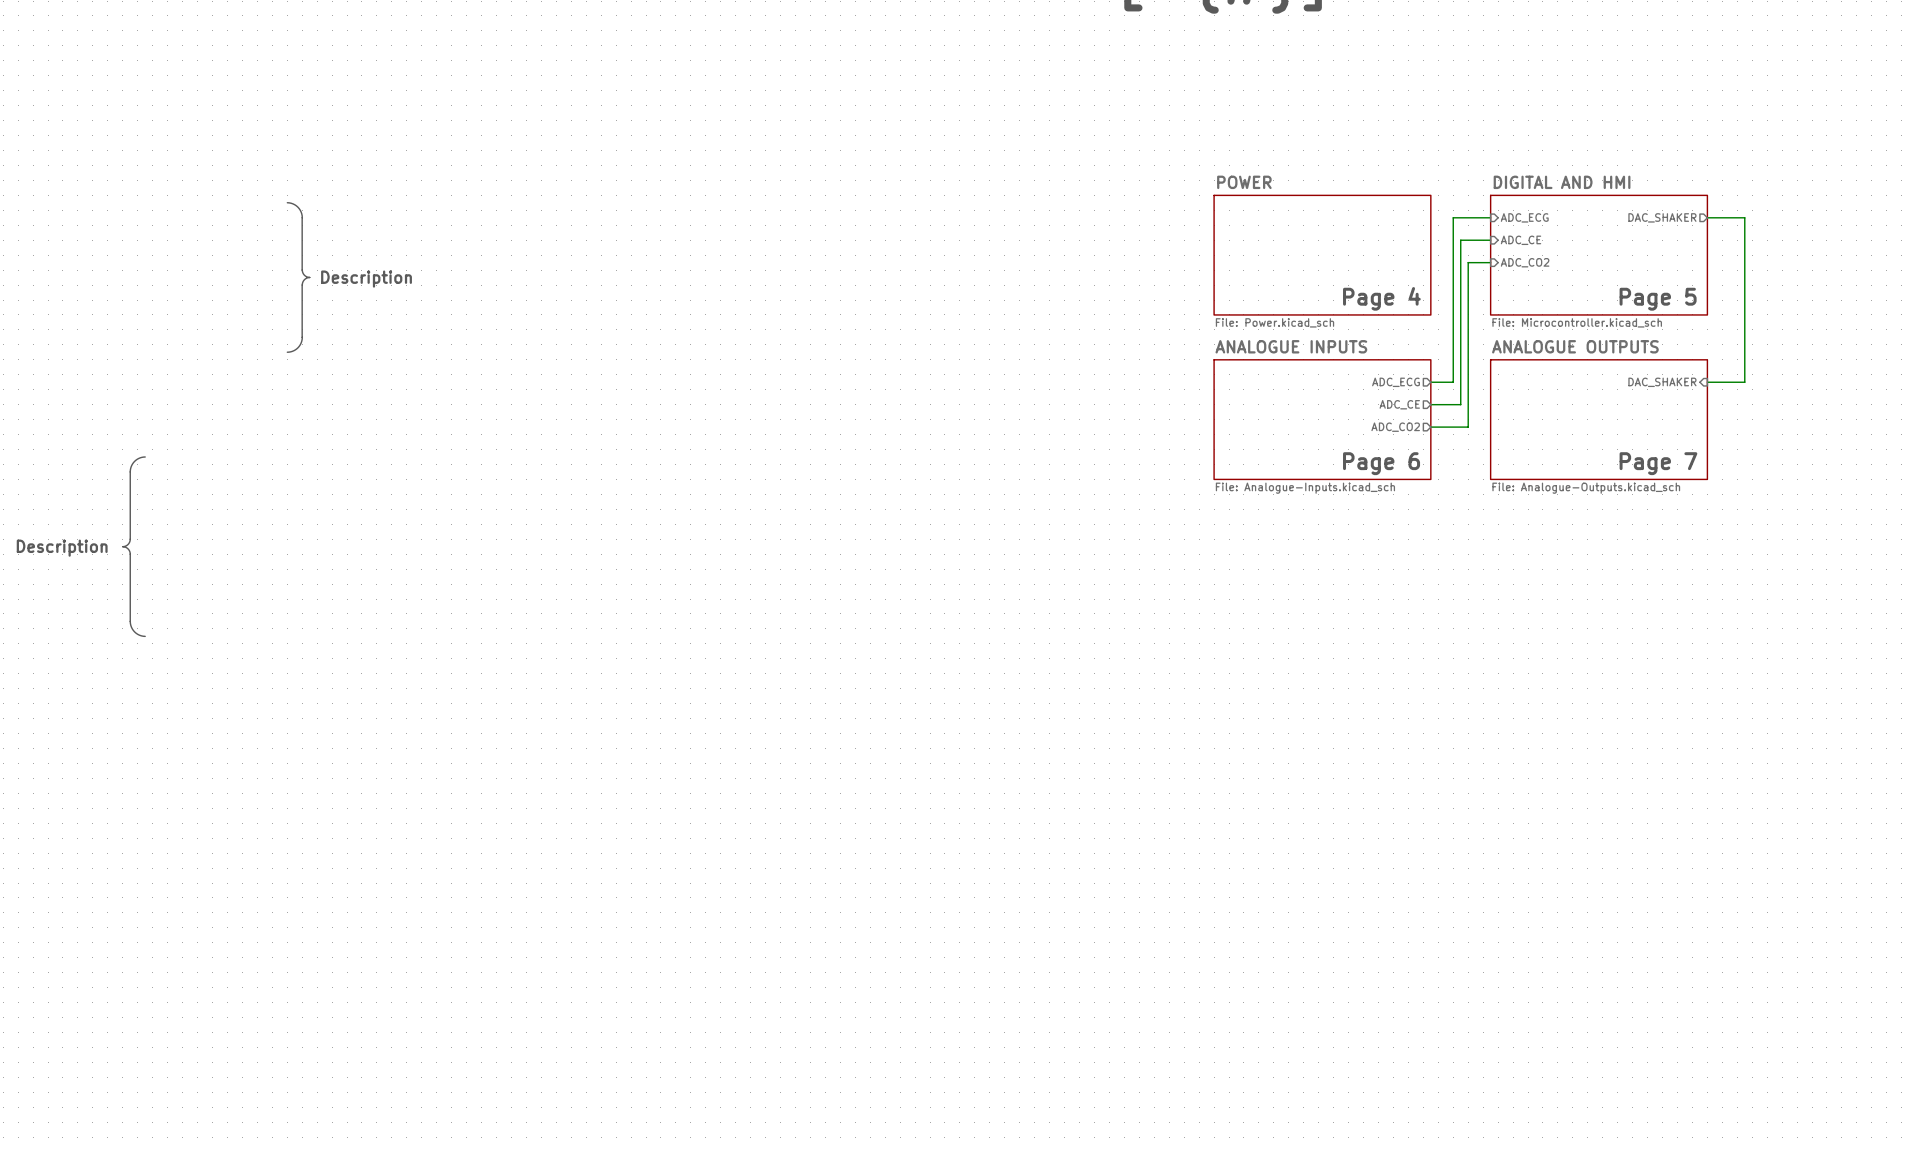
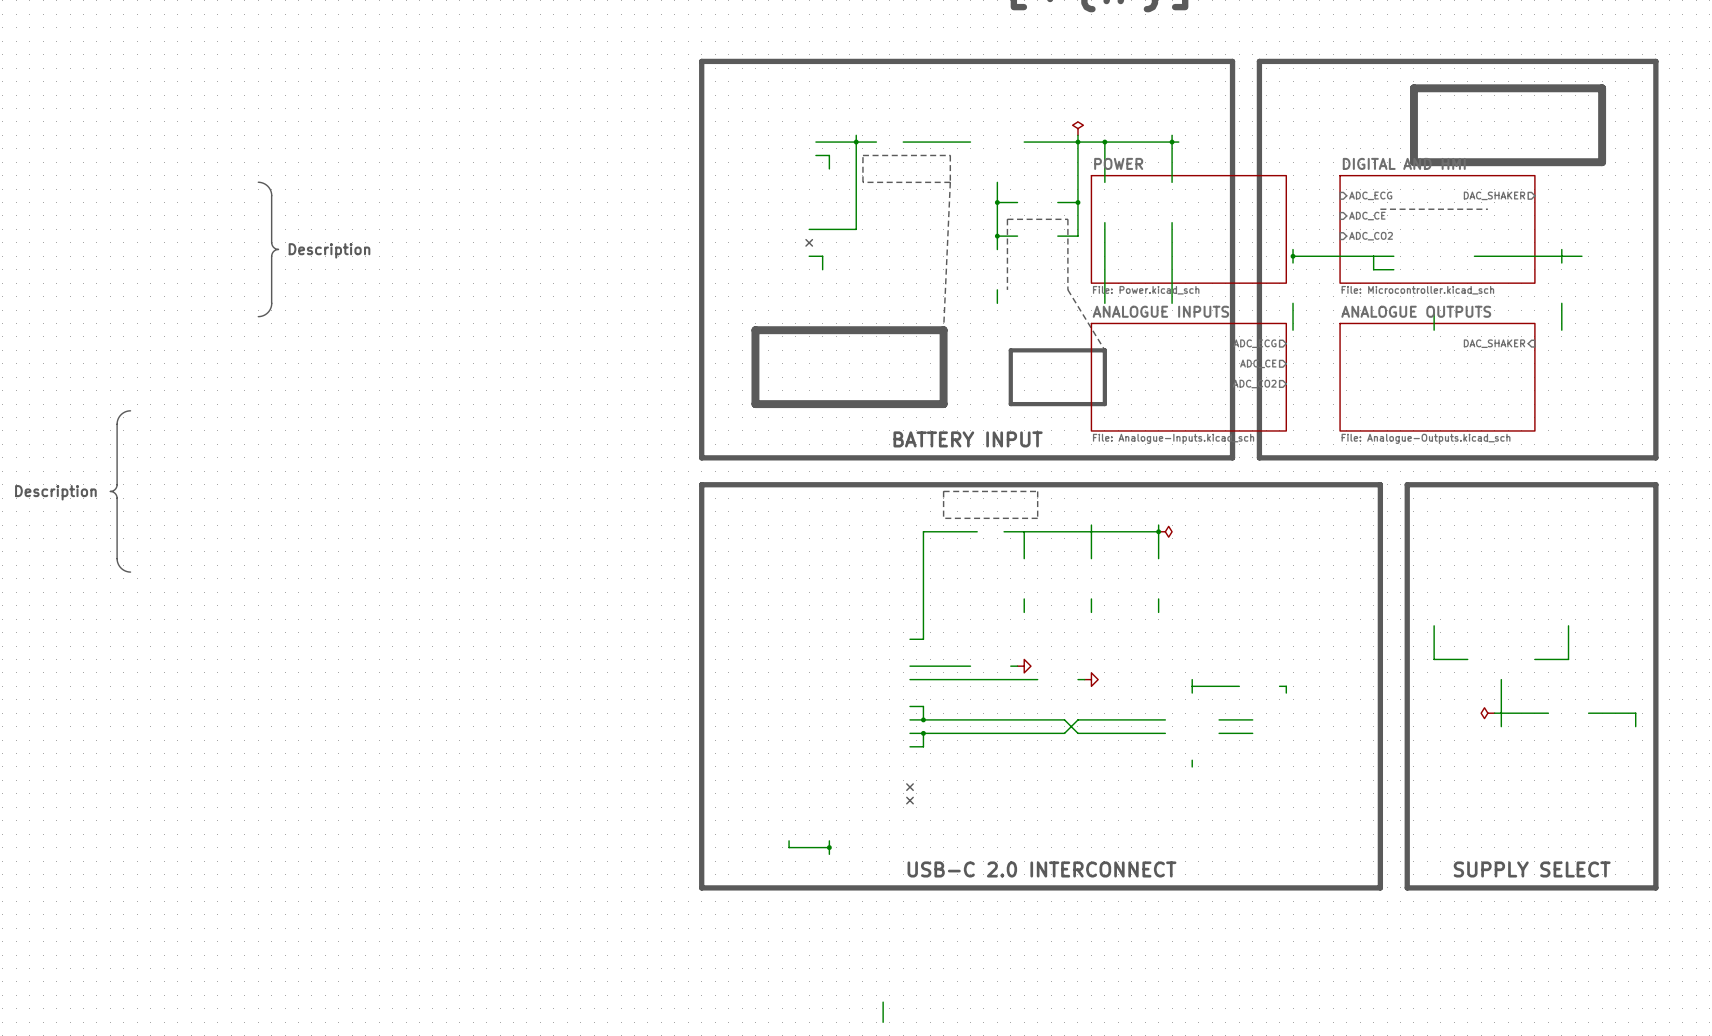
line: none -> (701, 61) (1232, 61) (1232, 457) (701, 457) (701, 61)
line: none -> (1259, 61) (1655, 61) (1655, 457) (1259, 457) (1259, 61)
line: none -> (1413, 88) (1602, 88) (1602, 162) (1413, 162) (1413, 88)
power symbol: none -> (1077, 128)
wire: none -> (856, 135) (856, 229) (809, 229)
wire: none -> (1077, 135) (1077, 236) (1057, 236)
wire: none -> (1172, 135) (1172, 182)
wire: none -> (815, 142) (876, 142)
junction: none -> (856, 142)
wire: none -> (903, 142) (970, 142)
wire: none -> (1024, 142) (1178, 142)
junction: none -> (1077, 142)
wire: none -> (1104, 142) (1104, 182)
junction: none -> (1104, 142)
junction: none -> (1172, 142)
wire: none -> (815, 155) (829, 155) (829, 168)
line: none -> (950, 182) (950, 155) (862, 155) (862, 182) (950, 182)
line: none -> (950, 182) (943, 330)
wire: none -> (997, 182) (997, 249)
wire: (1490, 217) (1453, 217) (1453, 382) (1430, 382) -> none
wire: (1707, 217) (1744, 217) (1744, 382) (1707, 382) -> none
wire: none -> (997, 202) (1017, 202)
junction: none -> (997, 202)
wire: none -> (1057, 202) (1077, 202)
junction: none -> (1077, 202)
line: none -> (1380, 209) (1487, 209)
wire: (1490, 240) (1460, 240) (1460, 404) (1430, 404) -> none
wire: none -> (1104, 222) (1104, 303)
wire: none -> (1172, 222) (1172, 303)
wire: none -> (997, 236) (1017, 236)
junction: none -> (997, 236)
wire: (1490, 262) (1468, 262) (1468, 427) (1430, 427) -> none
no-connect mark: none -> (809, 242)
wire: none -> (1293, 249) (1293, 262)
wire: none -> (1561, 249) (1561, 262)
wire: none -> (809, 256) (822, 256) (822, 269)
wire: none -> (1293, 256) (1393, 256)
junction: none -> (1293, 256)
wire: none -> (1373, 256) (1373, 269) (1393, 269)
wire: none -> (1474, 256) (1581, 256)
text: Page 4 (1381, 298) -> none
text: Page 5 (1658, 299) -> none
wire: none -> (997, 289) (997, 303)
line: none -> (1007, 289) (1007, 219) (1067, 219) (1067, 289) (1104, 350)
wire: none -> (1293, 303) (1293, 330)
wire: none -> (1561, 303) (1561, 330)
wire: none -> (1434, 310) (1434, 330)
line: none -> (943, 330) (755, 330) (755, 404) (943, 404) (943, 330)
line: none -> (1104, 350) (1104, 404) (1010, 404) (1010, 350) (1104, 350)
text: Page 6 (1381, 463) -> none
text: Page 7 (1658, 463) -> none
text: none -> BATTERY INPUT (968, 439)
line: none -> (701, 484) (701, 887) (1380, 887) (1380, 484) (701, 484)
line: none -> (1407, 484) (1655, 484) (1655, 887) (1407, 887) (1407, 484)
line: none -> (943, 491) (1037, 491) (1037, 518) (943, 518) (943, 491)
wire: none -> (1091, 525) (1091, 558)
wire: none -> (1158, 525) (1158, 558)
wire: none -> (977, 531) (923, 531) (923, 639) (910, 639)
wire: none -> (1004, 531) (1158, 531)
wire: none -> (1024, 531) (1024, 558)
junction: none -> (1158, 531)
power symbol: none -> (1165, 531)
wire: none -> (1024, 598) (1024, 612)
wire: none -> (1091, 598) (1091, 612)
wire: none -> (1158, 598) (1158, 612)
wire: none -> (1434, 625) (1434, 659) (1467, 659)
wire: none -> (1568, 625) (1568, 659) (1534, 659)
wire: none -> (910, 666) (970, 666)
wire: none -> (1010, 666) (1017, 666)
power symbol: none -> (1024, 666)
wire: none -> (910, 679) (1037, 679)
wire: none -> (1077, 679) (1084, 679)
power symbol: none -> (1091, 679)
wire: none -> (1192, 679) (1192, 693)
wire: none -> (1501, 679) (1501, 726)
wire: none -> (1192, 686) (1239, 686)
wire: none -> (1279, 686) (1286, 686) (1286, 693)
wire: none -> (910, 706) (923, 706) (923, 719)
power symbol: none -> (1487, 713)
wire: none -> (1494, 713) (1548, 713)
wire: none -> (1588, 713) (1635, 713) (1635, 726)
wire: none -> (910, 719) (1064, 719) (1077, 733) (1165, 733)
junction: none -> (923, 719)
wire: none -> (1165, 719) (1077, 719) (1064, 733) (910, 733)
wire: none -> (1219, 719) (1252, 719)
wire: none -> (923, 733) (923, 746) (910, 746)
junction: none -> (923, 733)
wire: none -> (1219, 733) (1252, 733)
wire: none -> (1192, 760) (1192, 766)
no-connect mark: none -> (910, 787)
no-connect mark: none -> (910, 800)
wire: none -> (789, 840) (789, 847) (829, 847)
wire: none -> (829, 840) (829, 854)
junction: none -> (829, 847)
text: none -> USB-C 2.0 INTERCONNECT (1041, 869)
text: none -> SUPPLY SELECT (1532, 869)
wire: none -> (883, 1002) (883, 1022)

